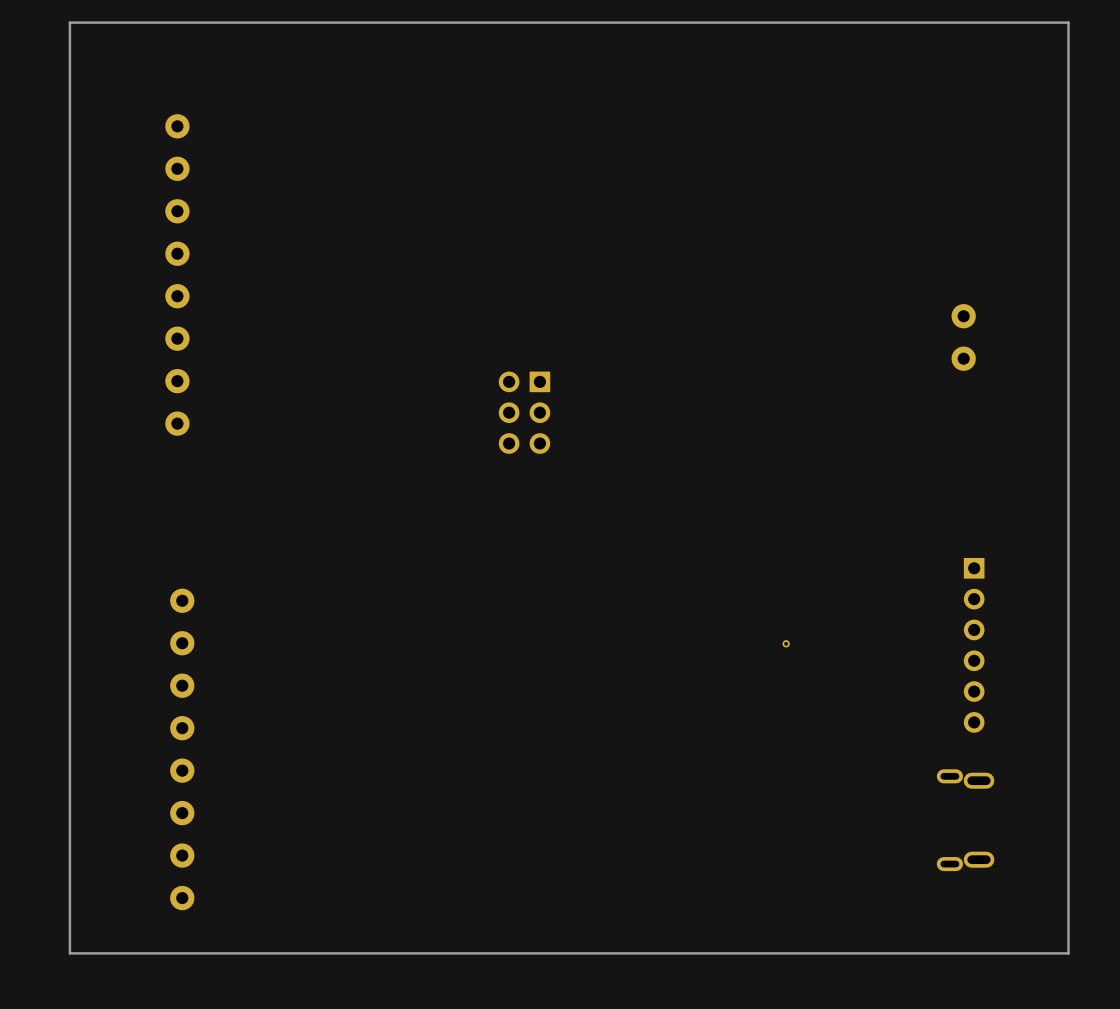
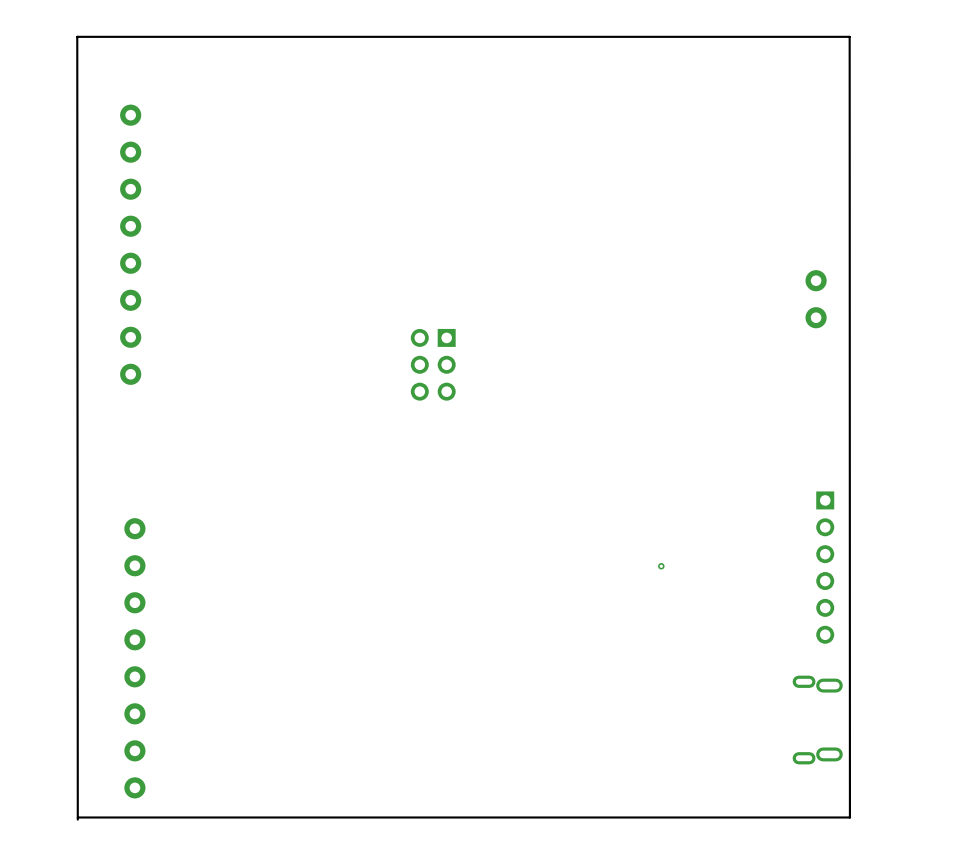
board edge: (1068, 22) (1068, 953) (69, 953) (69, 22) (1068, 22) -> none
board edge: none -> (77, 817) (849, 817) (849, 36) (77, 36) (77, 819)

